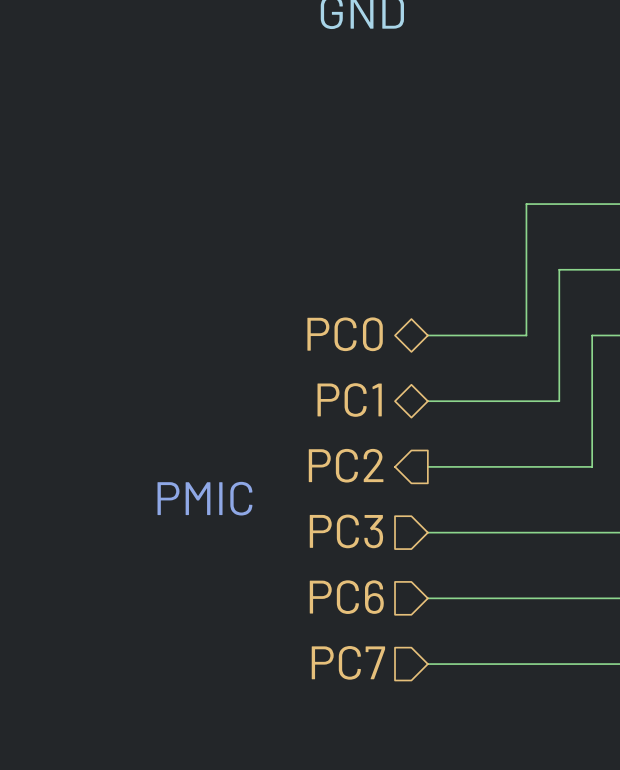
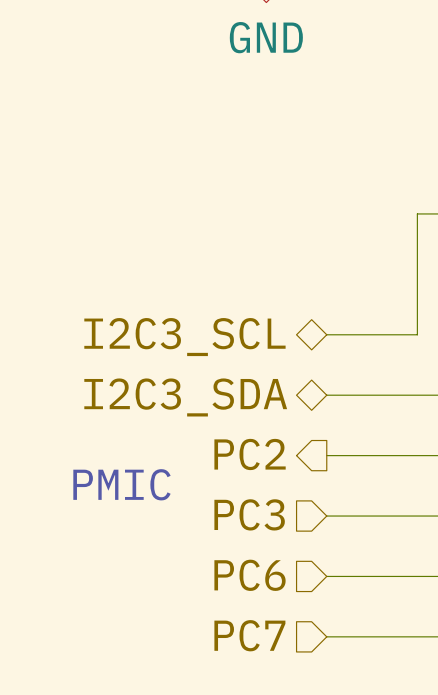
hierarchical label: PC0 (345, 334) -> I2C3_SCL (184, 337)
hierarchical label: PC1 (349, 400) -> I2C3_SDA (185, 397)

